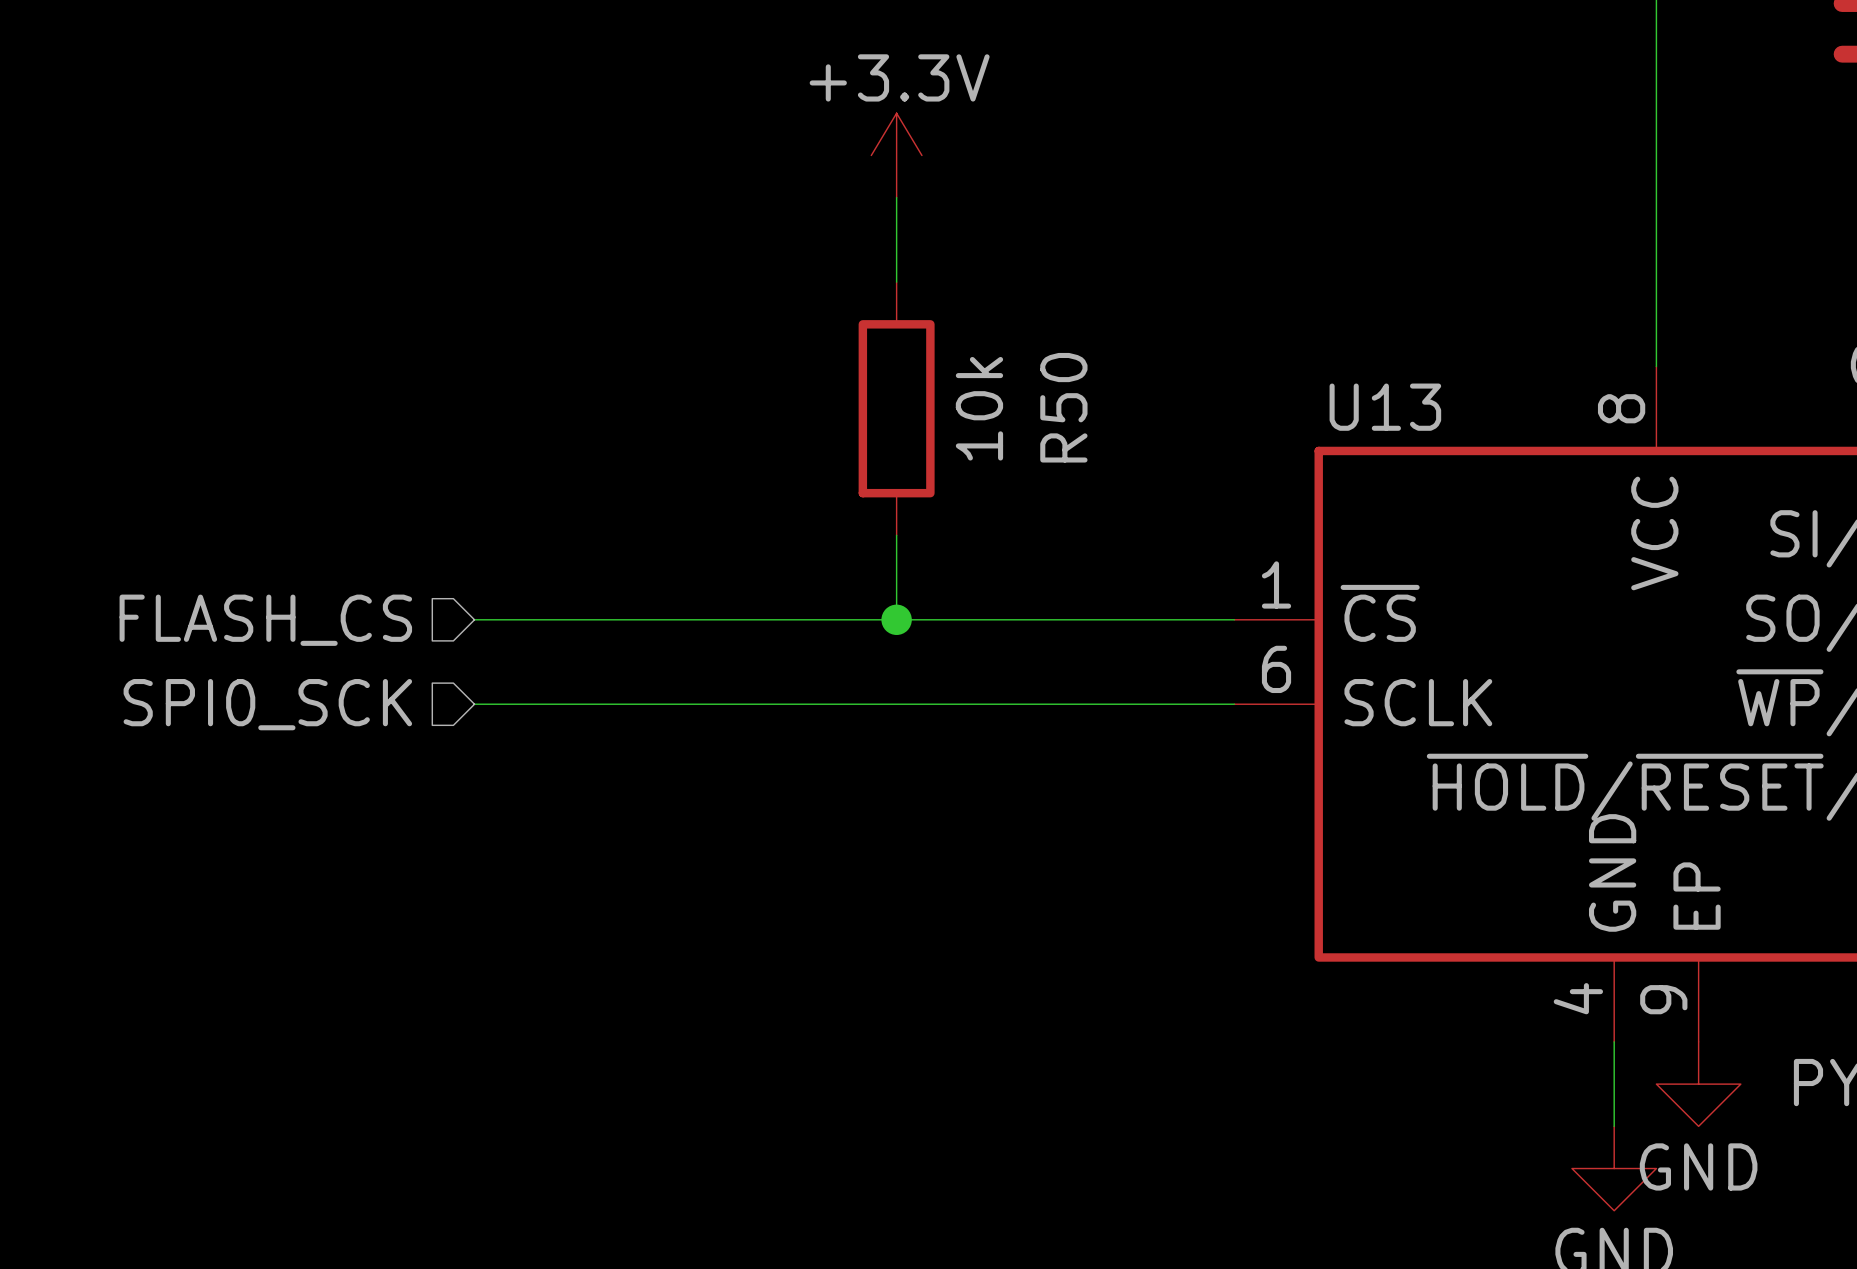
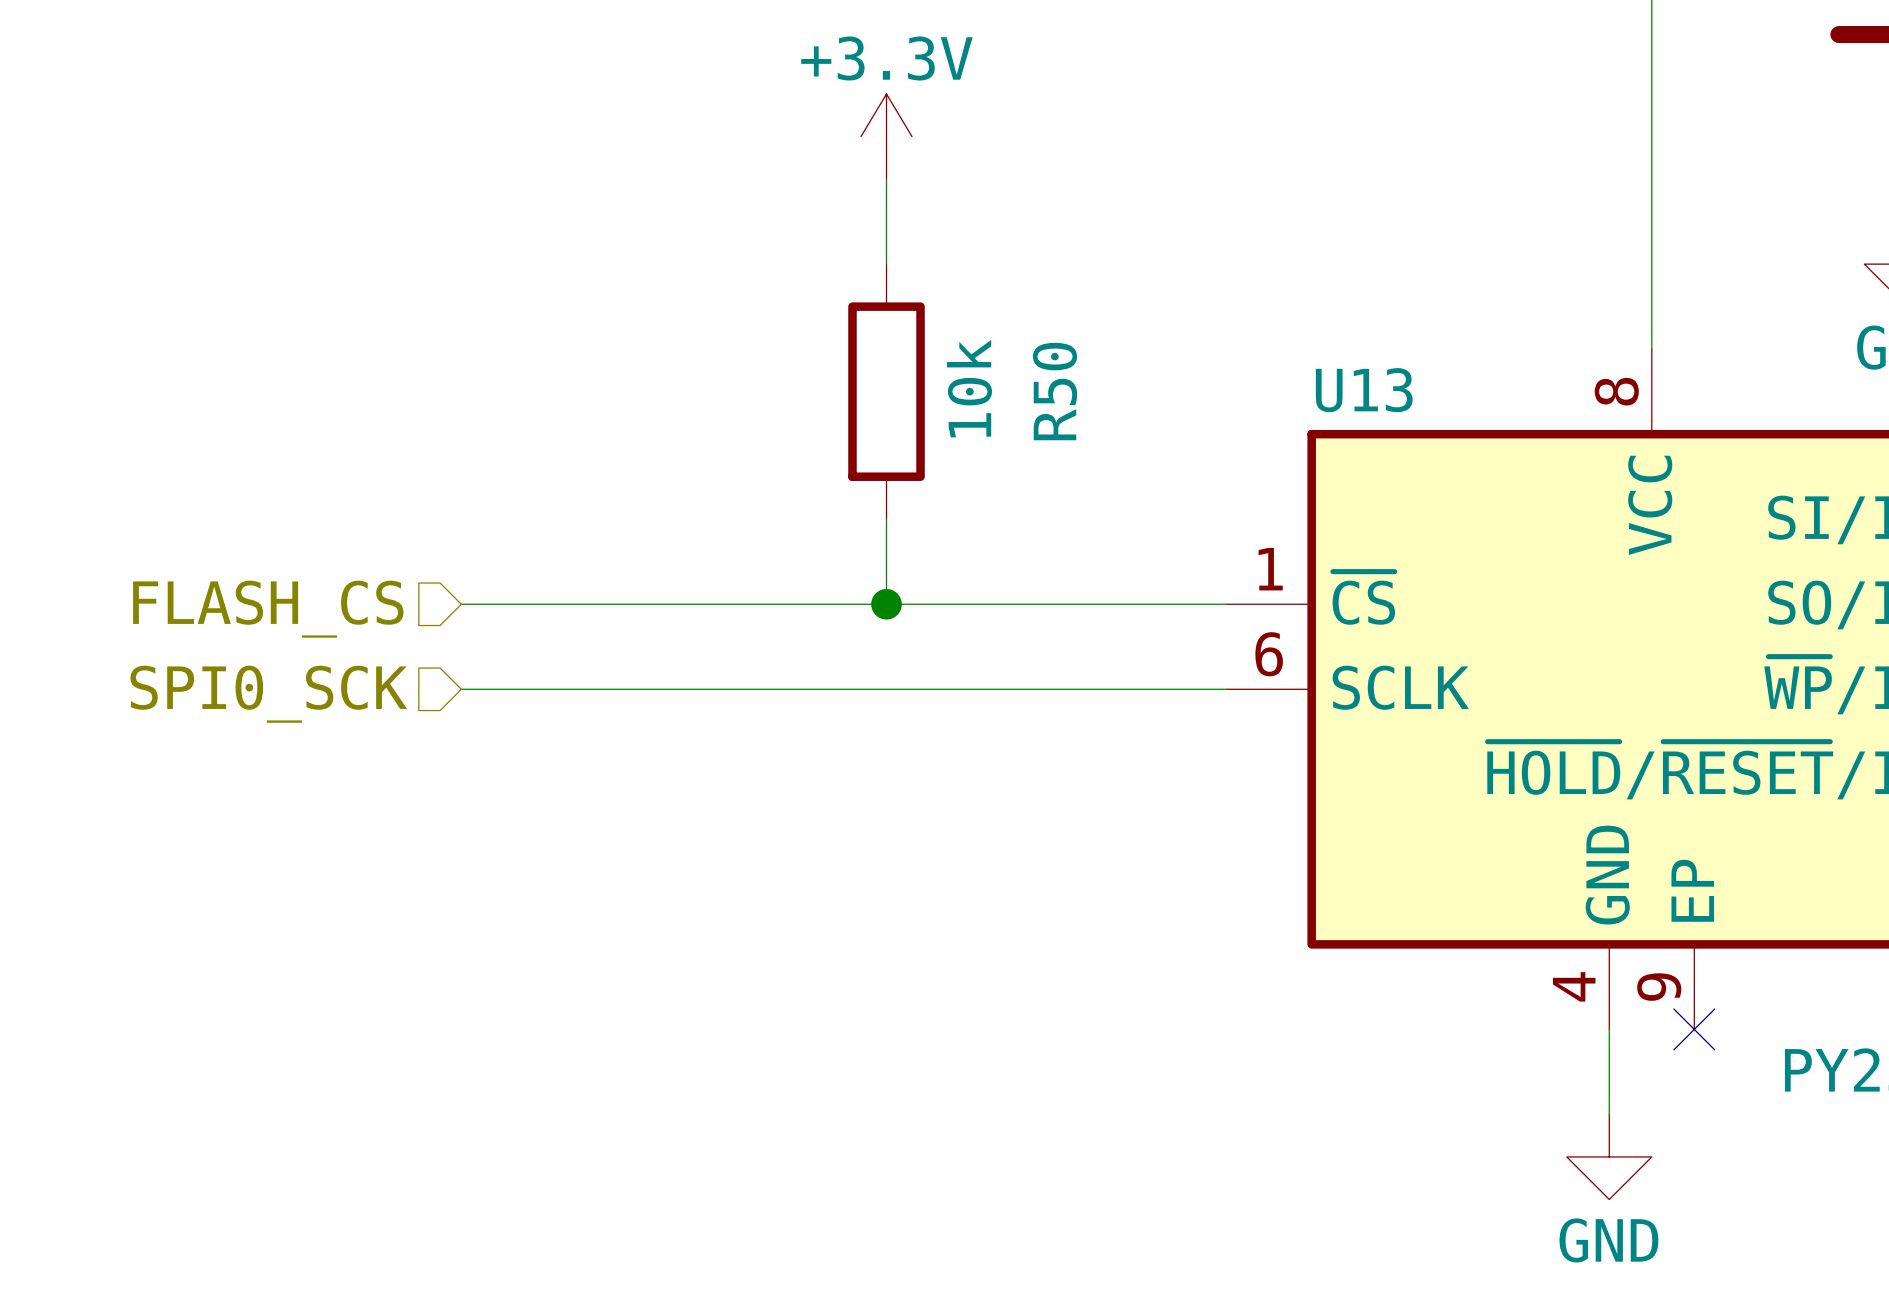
no-connect mark: none -> (1694, 1029)
power symbol: GND (1698, 1084) -> none

